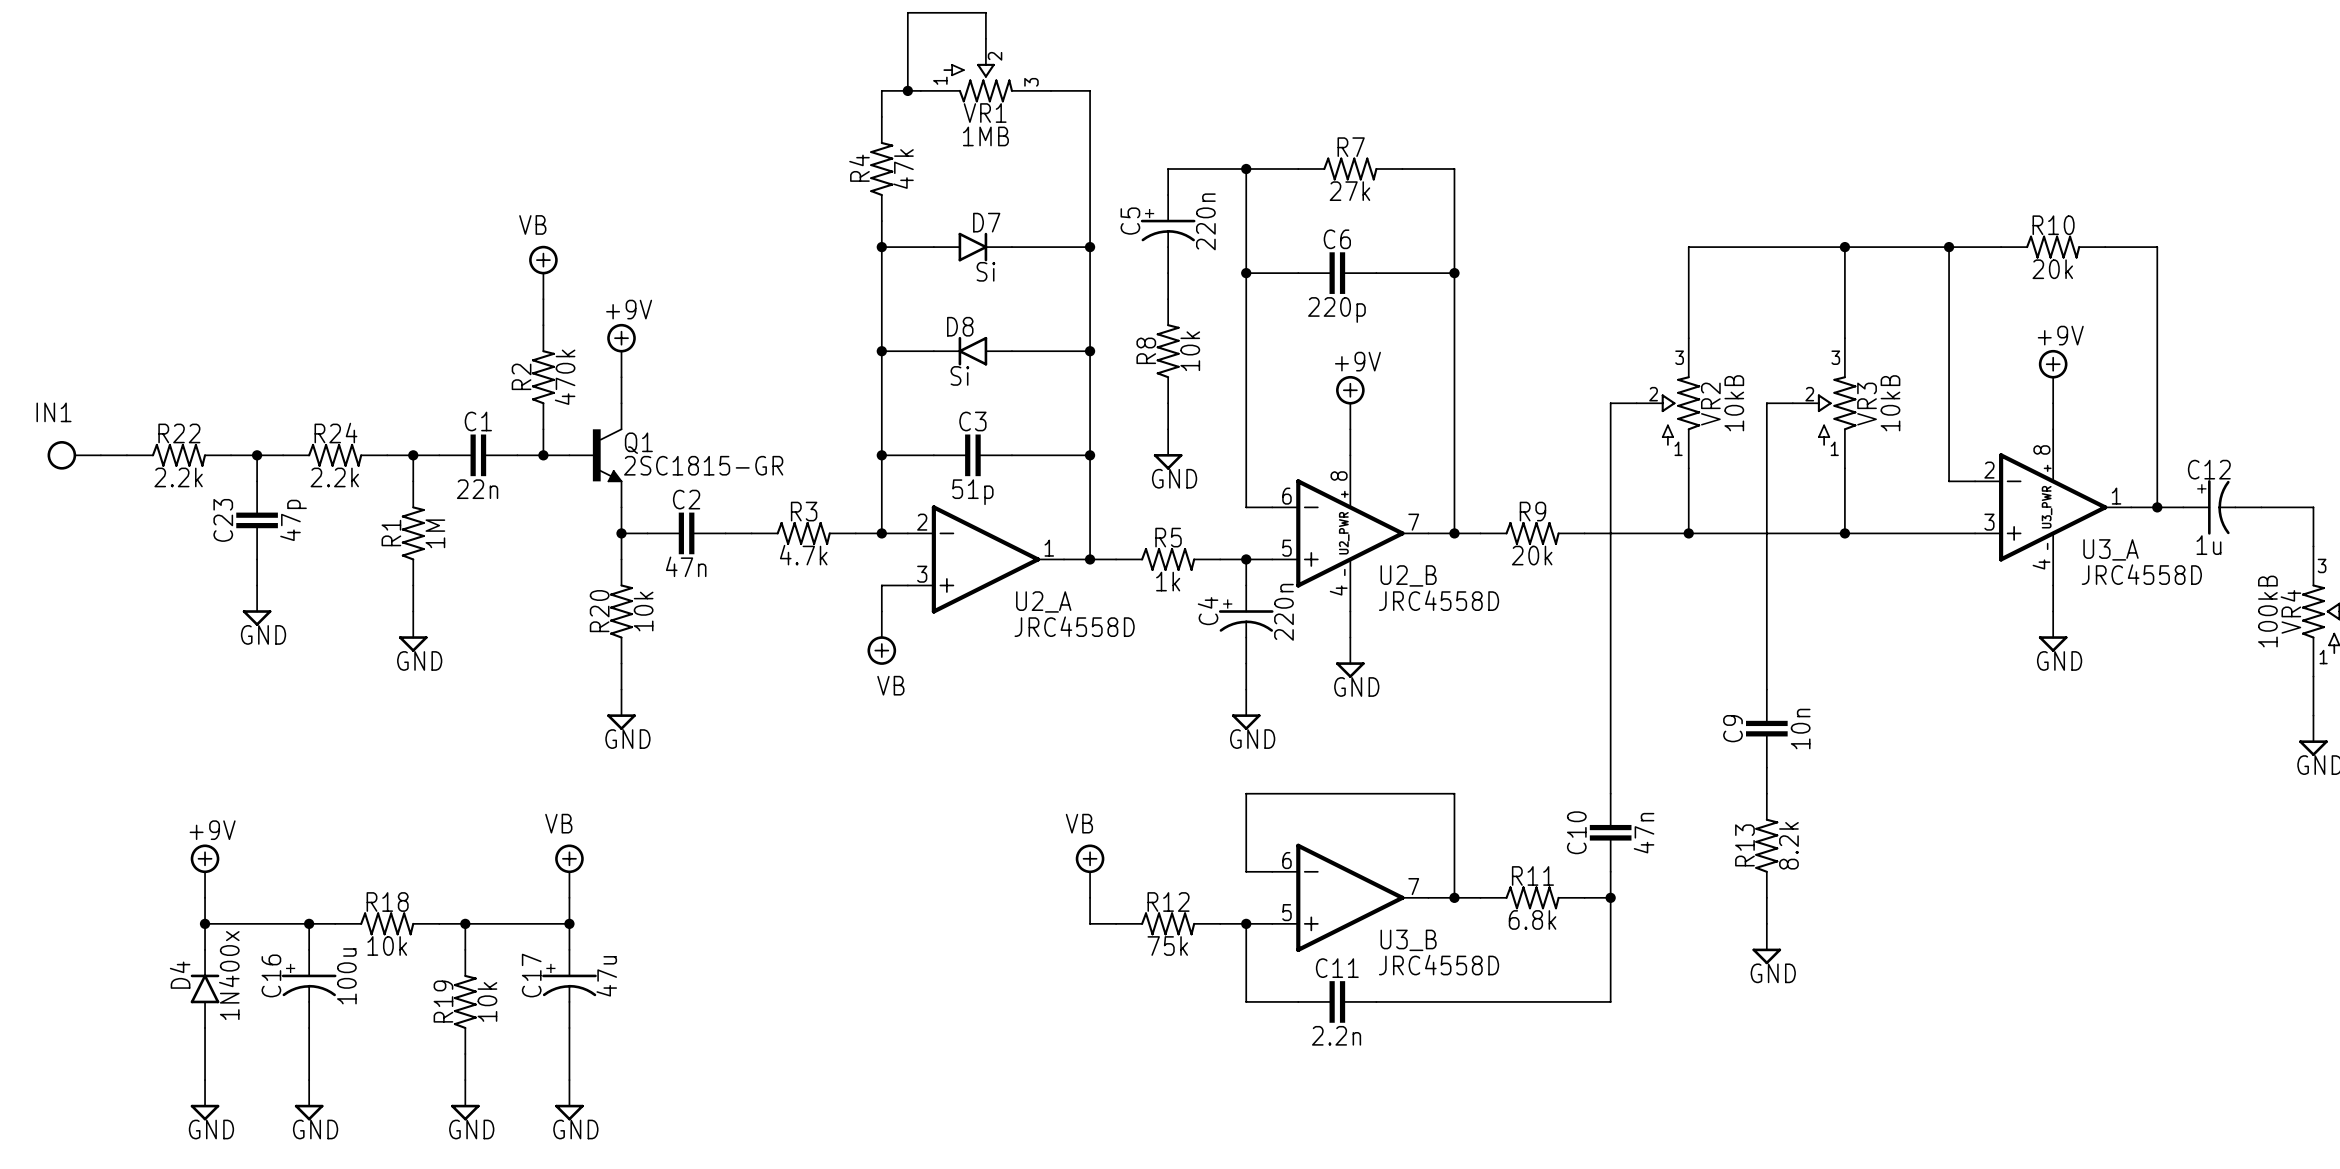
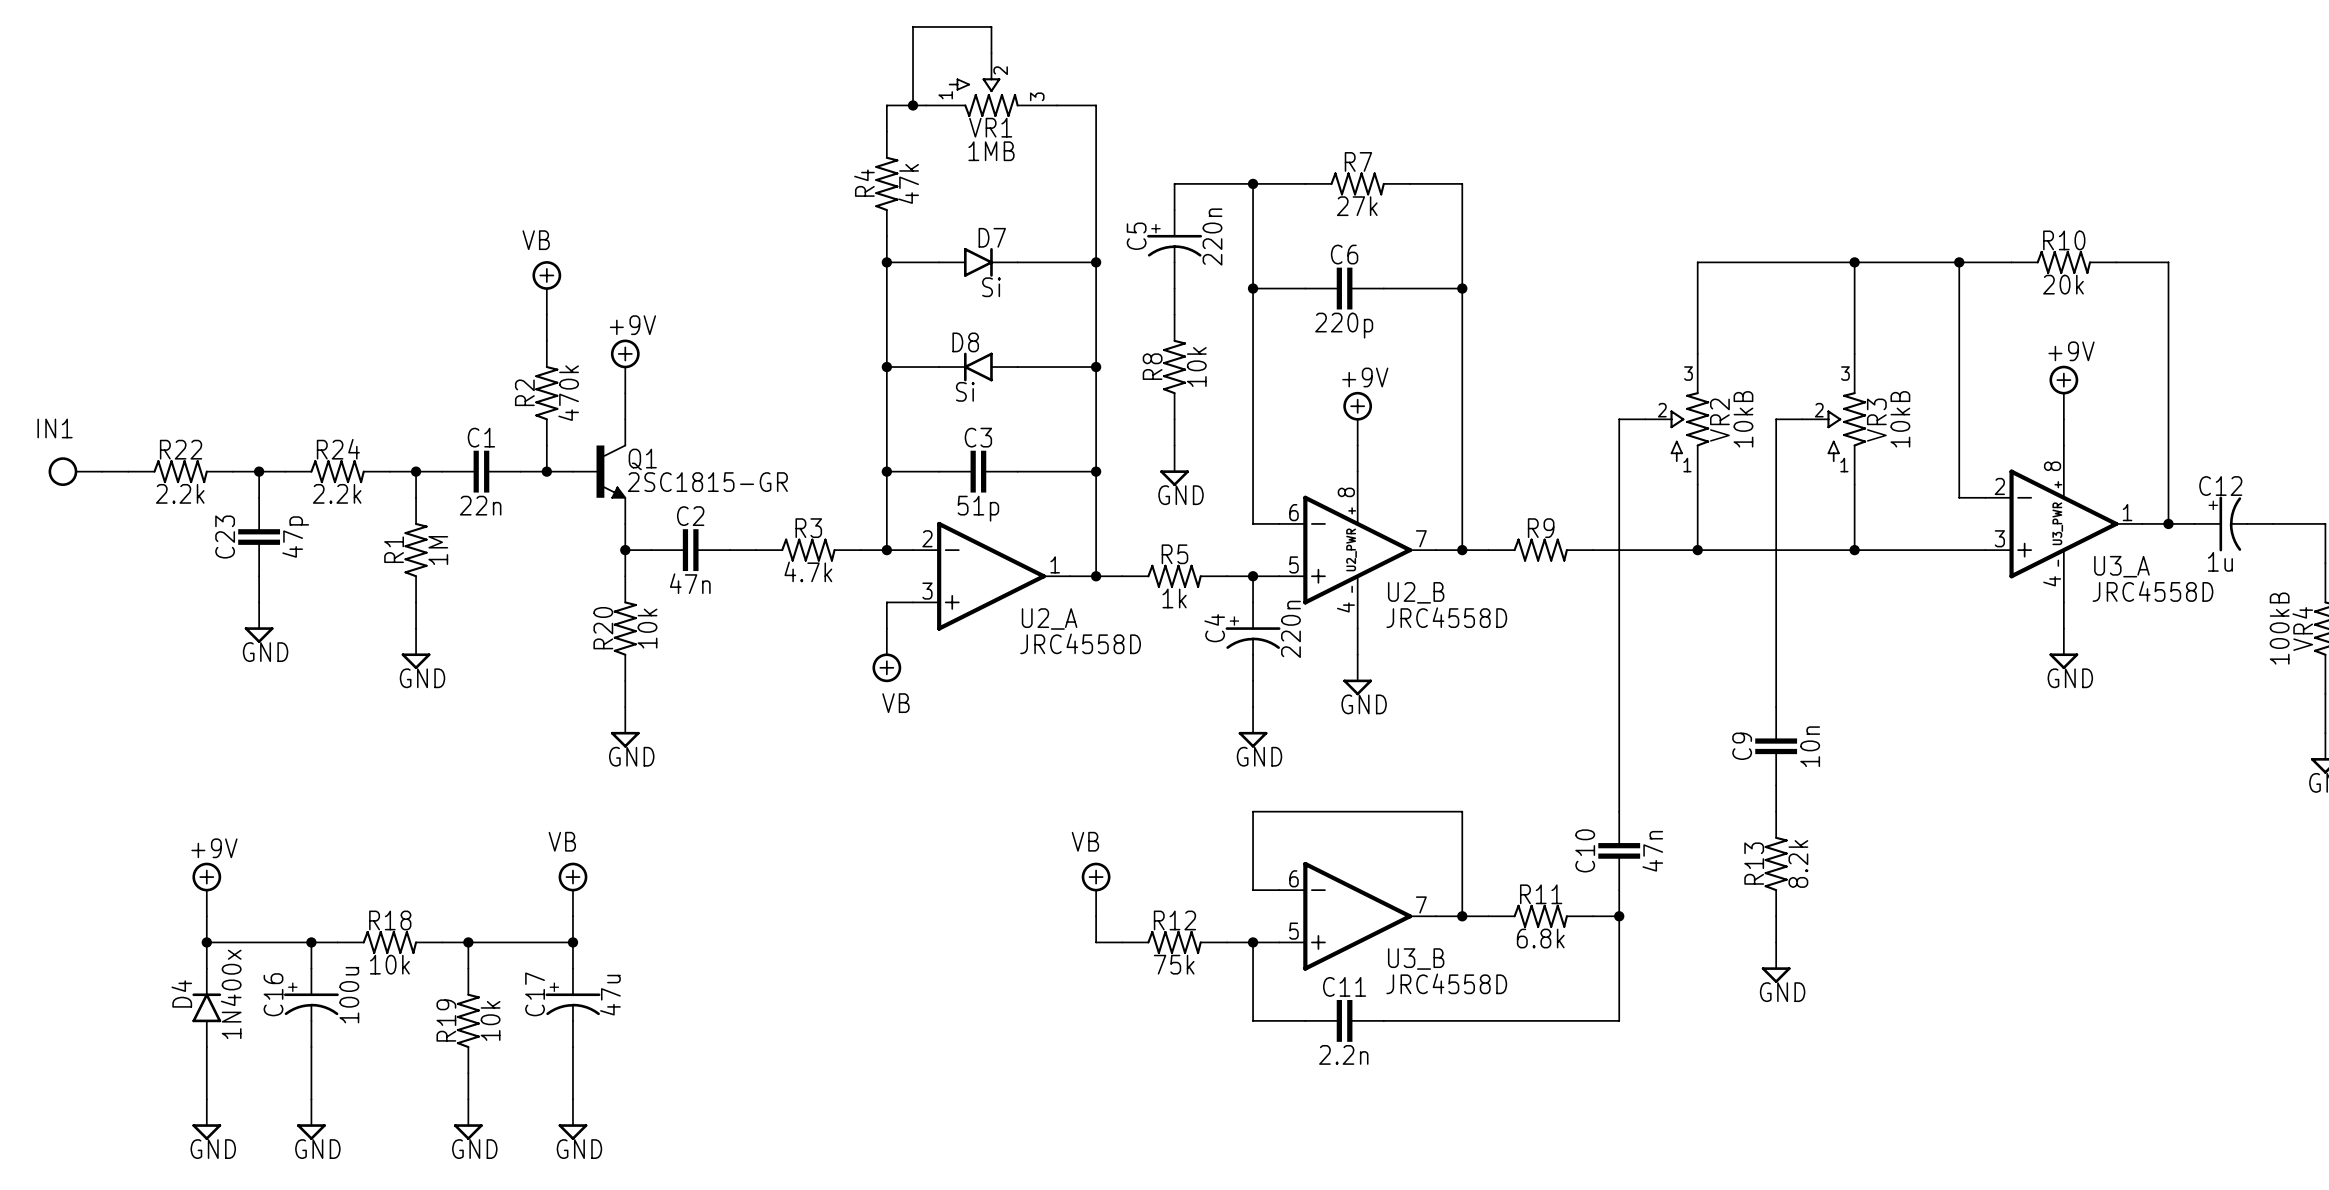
R9 value: 20k (1532, 555) -> none

